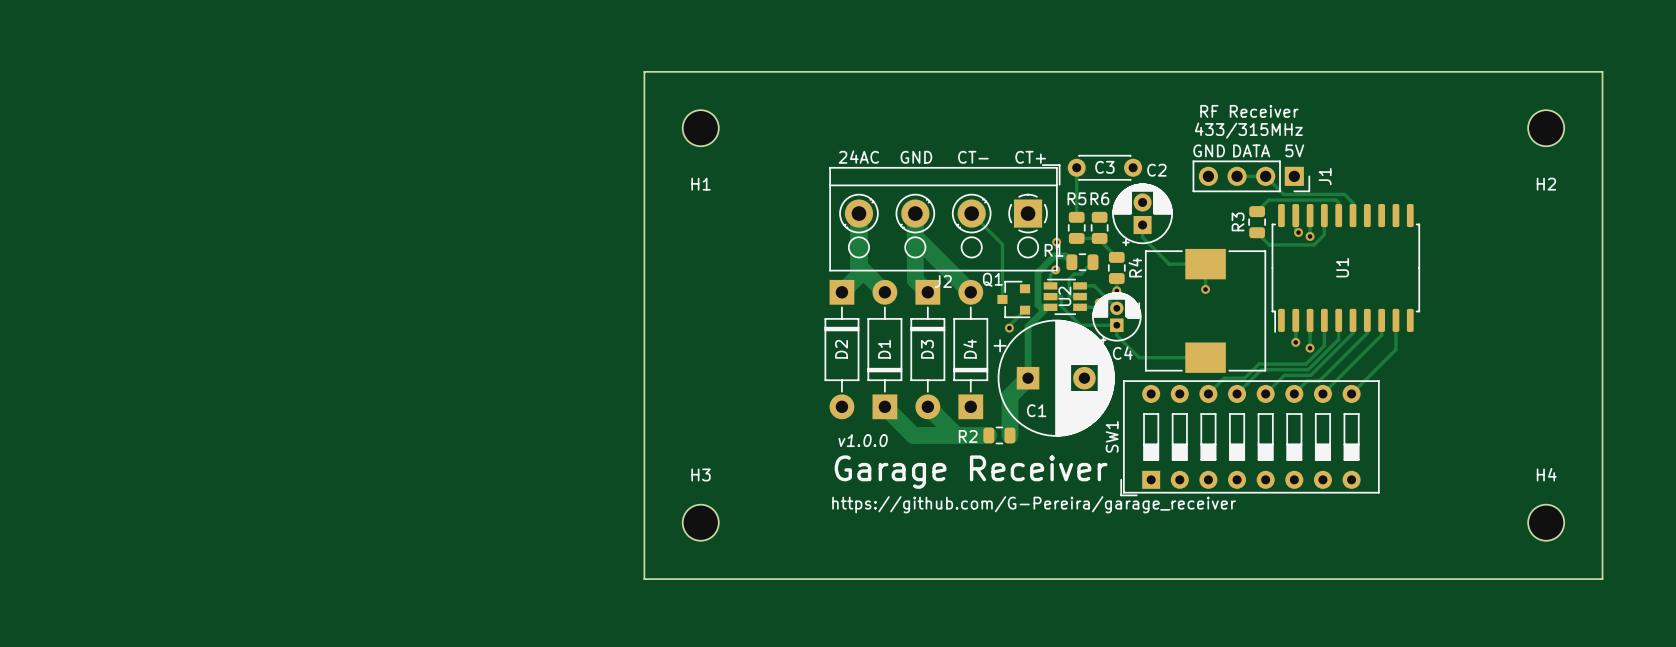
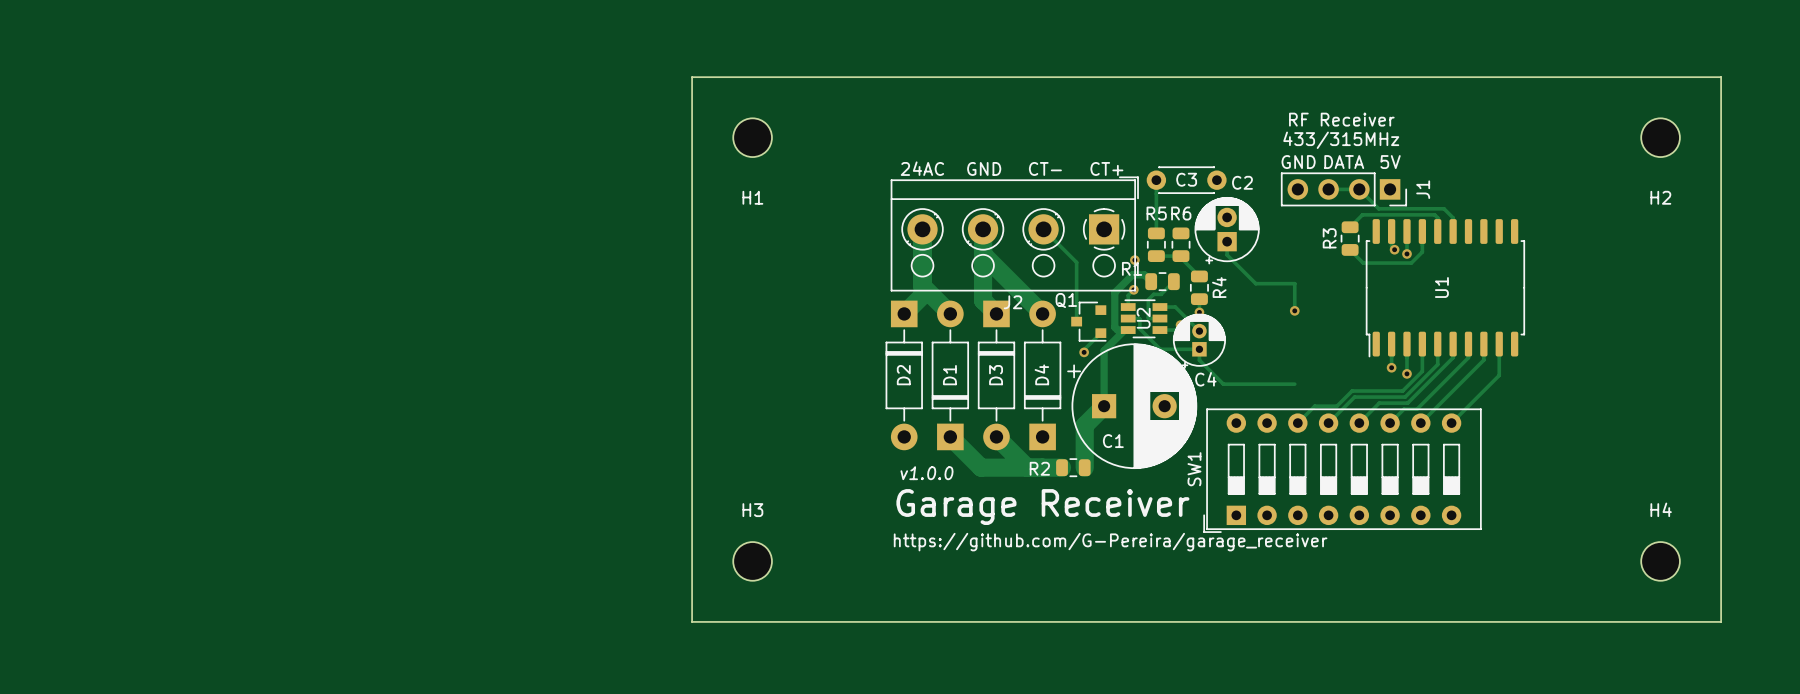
part: (1205, 310) -> none

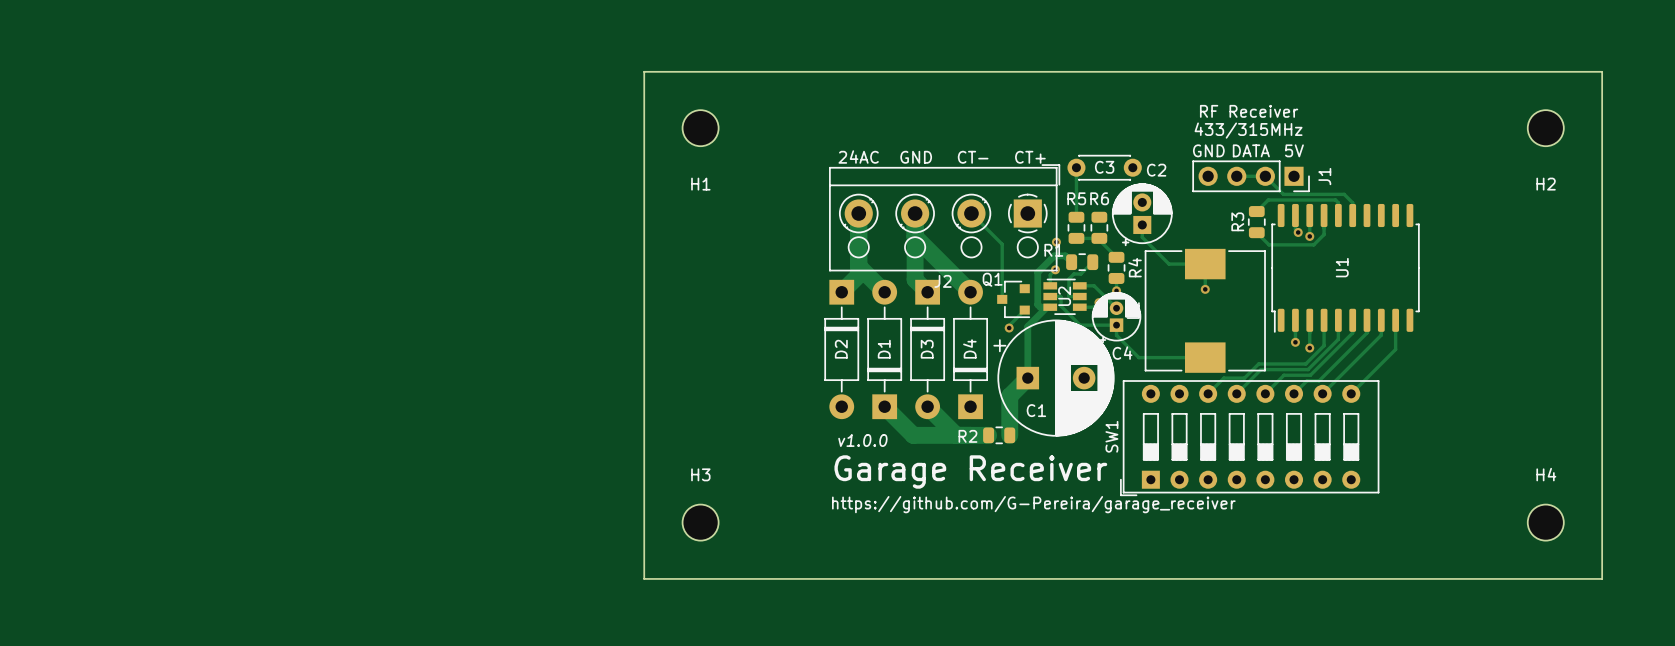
part: none -> (1205, 310)

